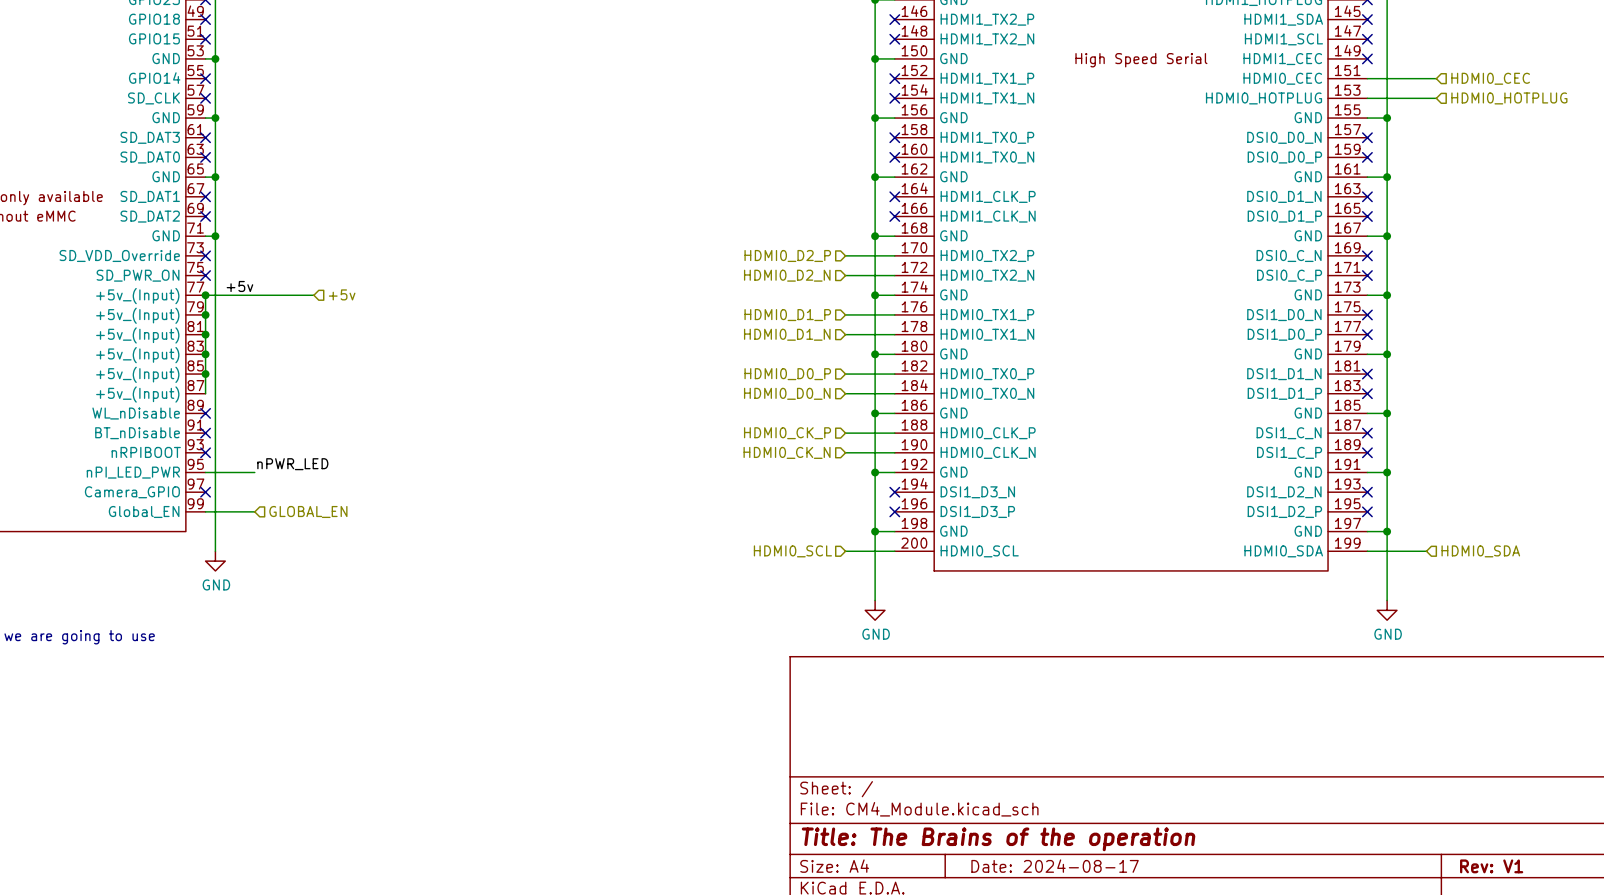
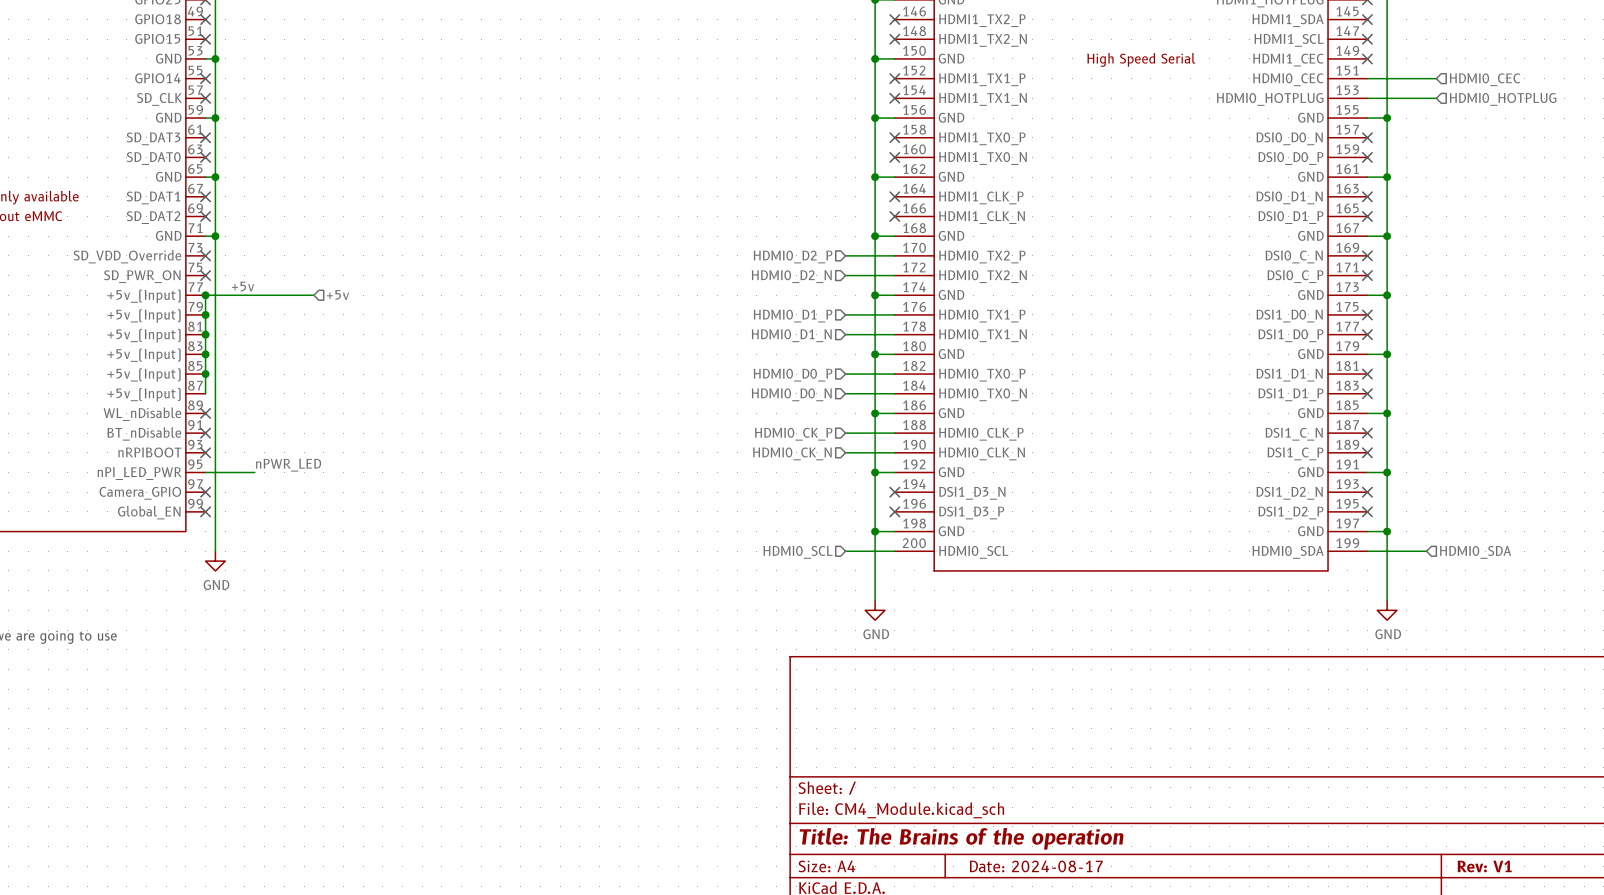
wire: (205, 511) (254, 511) -> none
no-connect mark: none -> (205, 511)
hierarchical label: GLOBAL_EN (308, 511) -> none

